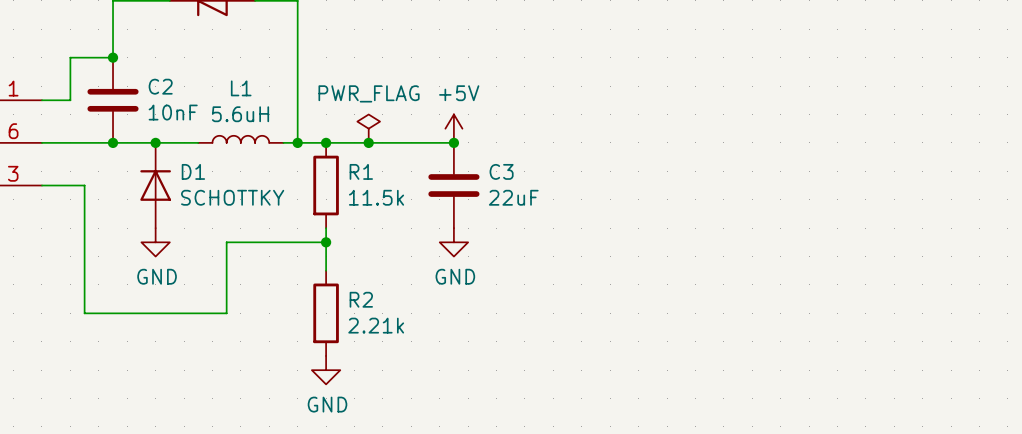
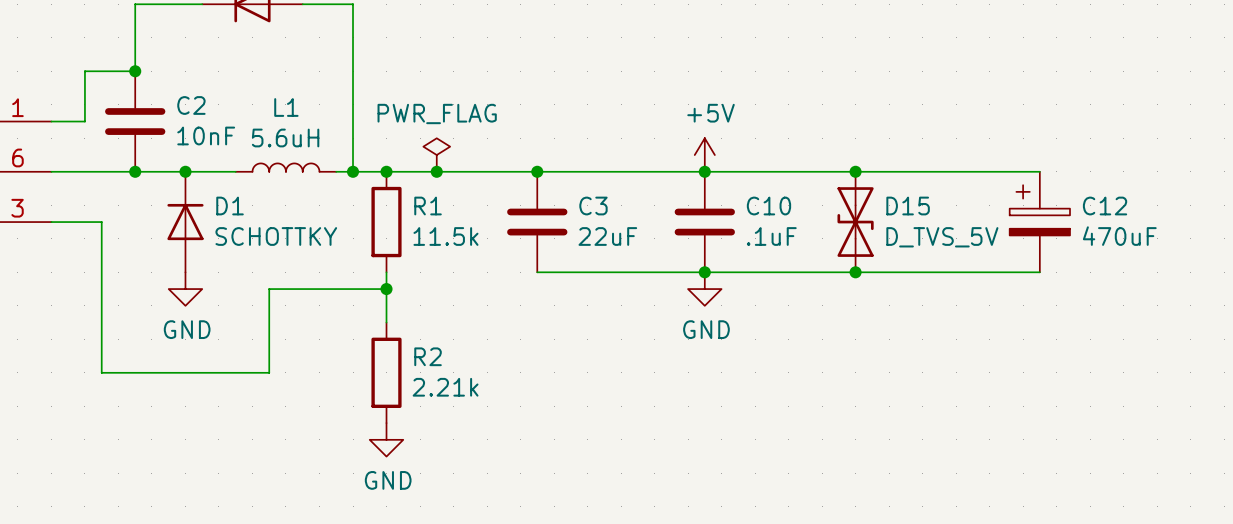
power symbol position: +5V (453, 128) -> +5V (704, 155)
wire: none -> (537, 171) (1039, 171)
junction: none -> (704, 171)
junction: none -> (855, 171)
C10: none -> .1uF (704, 222)
D15: none -> D_TVS_5V (855, 222)
C12: none -> 470uF (1039, 222)
wire: none -> (537, 272) (1039, 272)
junction: none -> (704, 272)
junction: none -> (855, 272)
power symbol position: GND (453, 242) -> GND (704, 289)

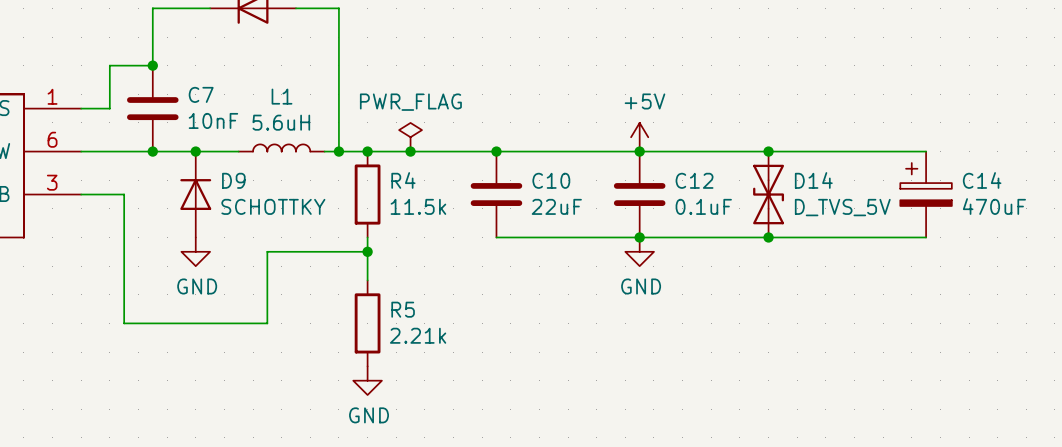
C2 name: C2 (191, 105) -> C7 (201, 94)
D1 name: D1 (230, 206) -> D9 (233, 180)
R1 name: R1 (428, 206) -> R4 (403, 180)
C3 name: C3 (593, 206) -> C10 (551, 180)
C10 name: C10 (768, 206) -> C12 (694, 180)
D15 name: D15 (908, 206) -> D14 (813, 180)
C12 name: C12 (1105, 206) -> C14 (982, 180)
C10 value: .1uF (771, 236) -> 0.1uF (703, 206)
R2 name: R2 (428, 356) -> R5 (403, 309)

